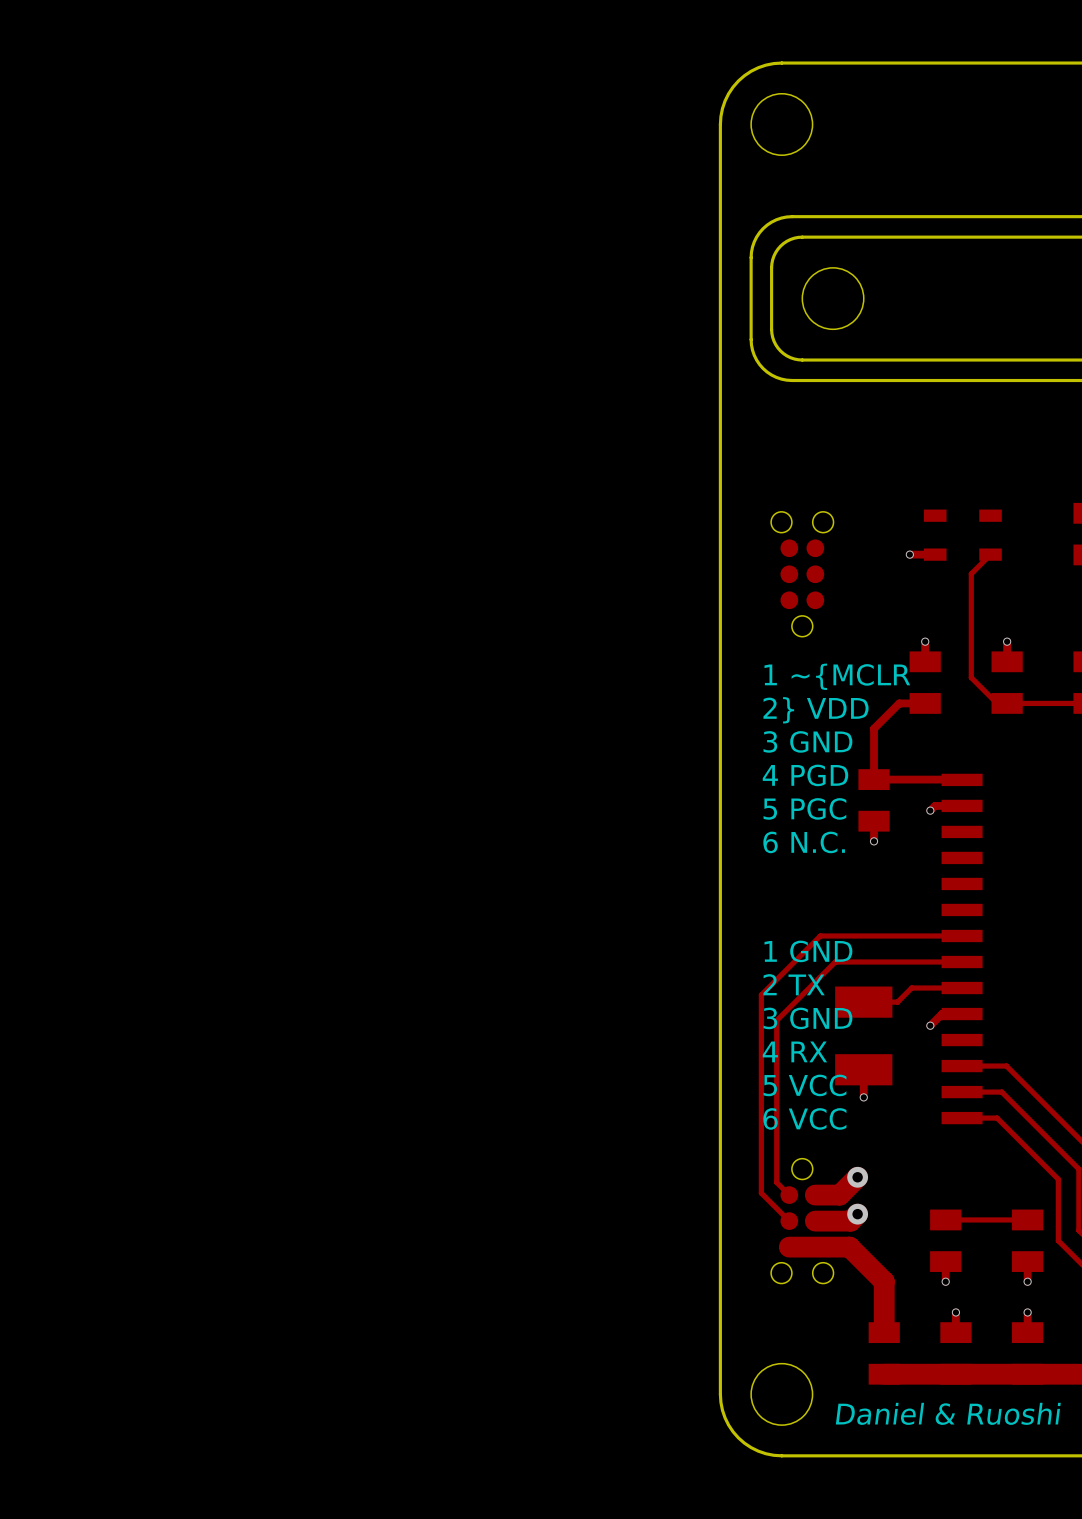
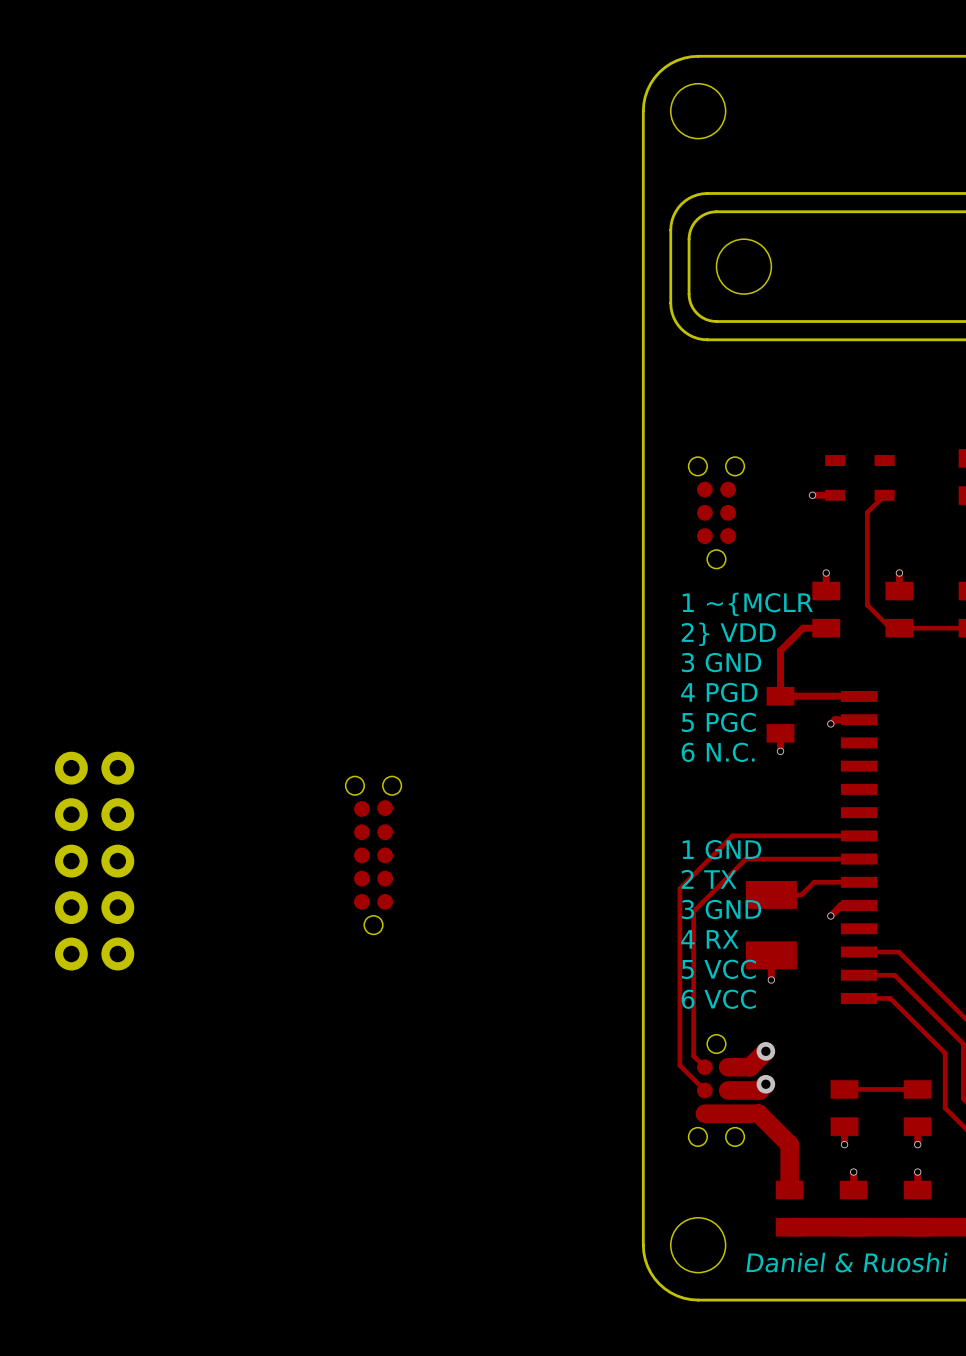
part: none -> (373, 855)
part: none -> (94, 861)

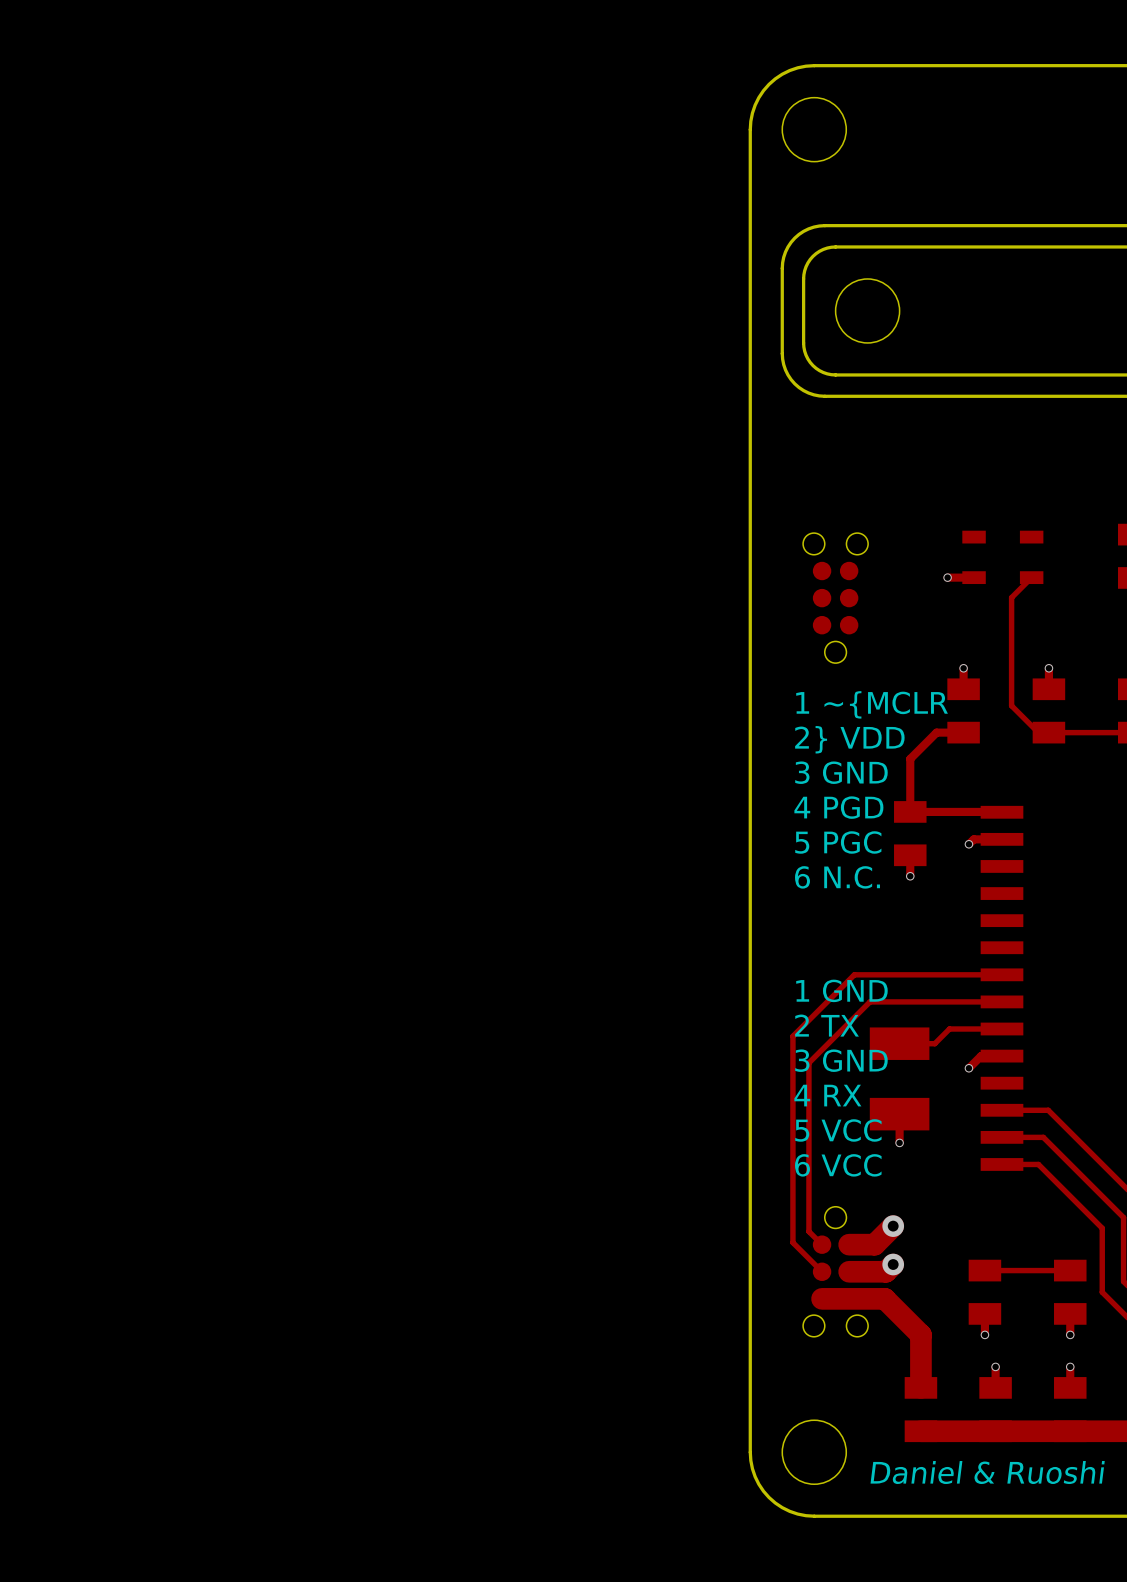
part: (373, 855) -> none
part: (94, 861) -> none

